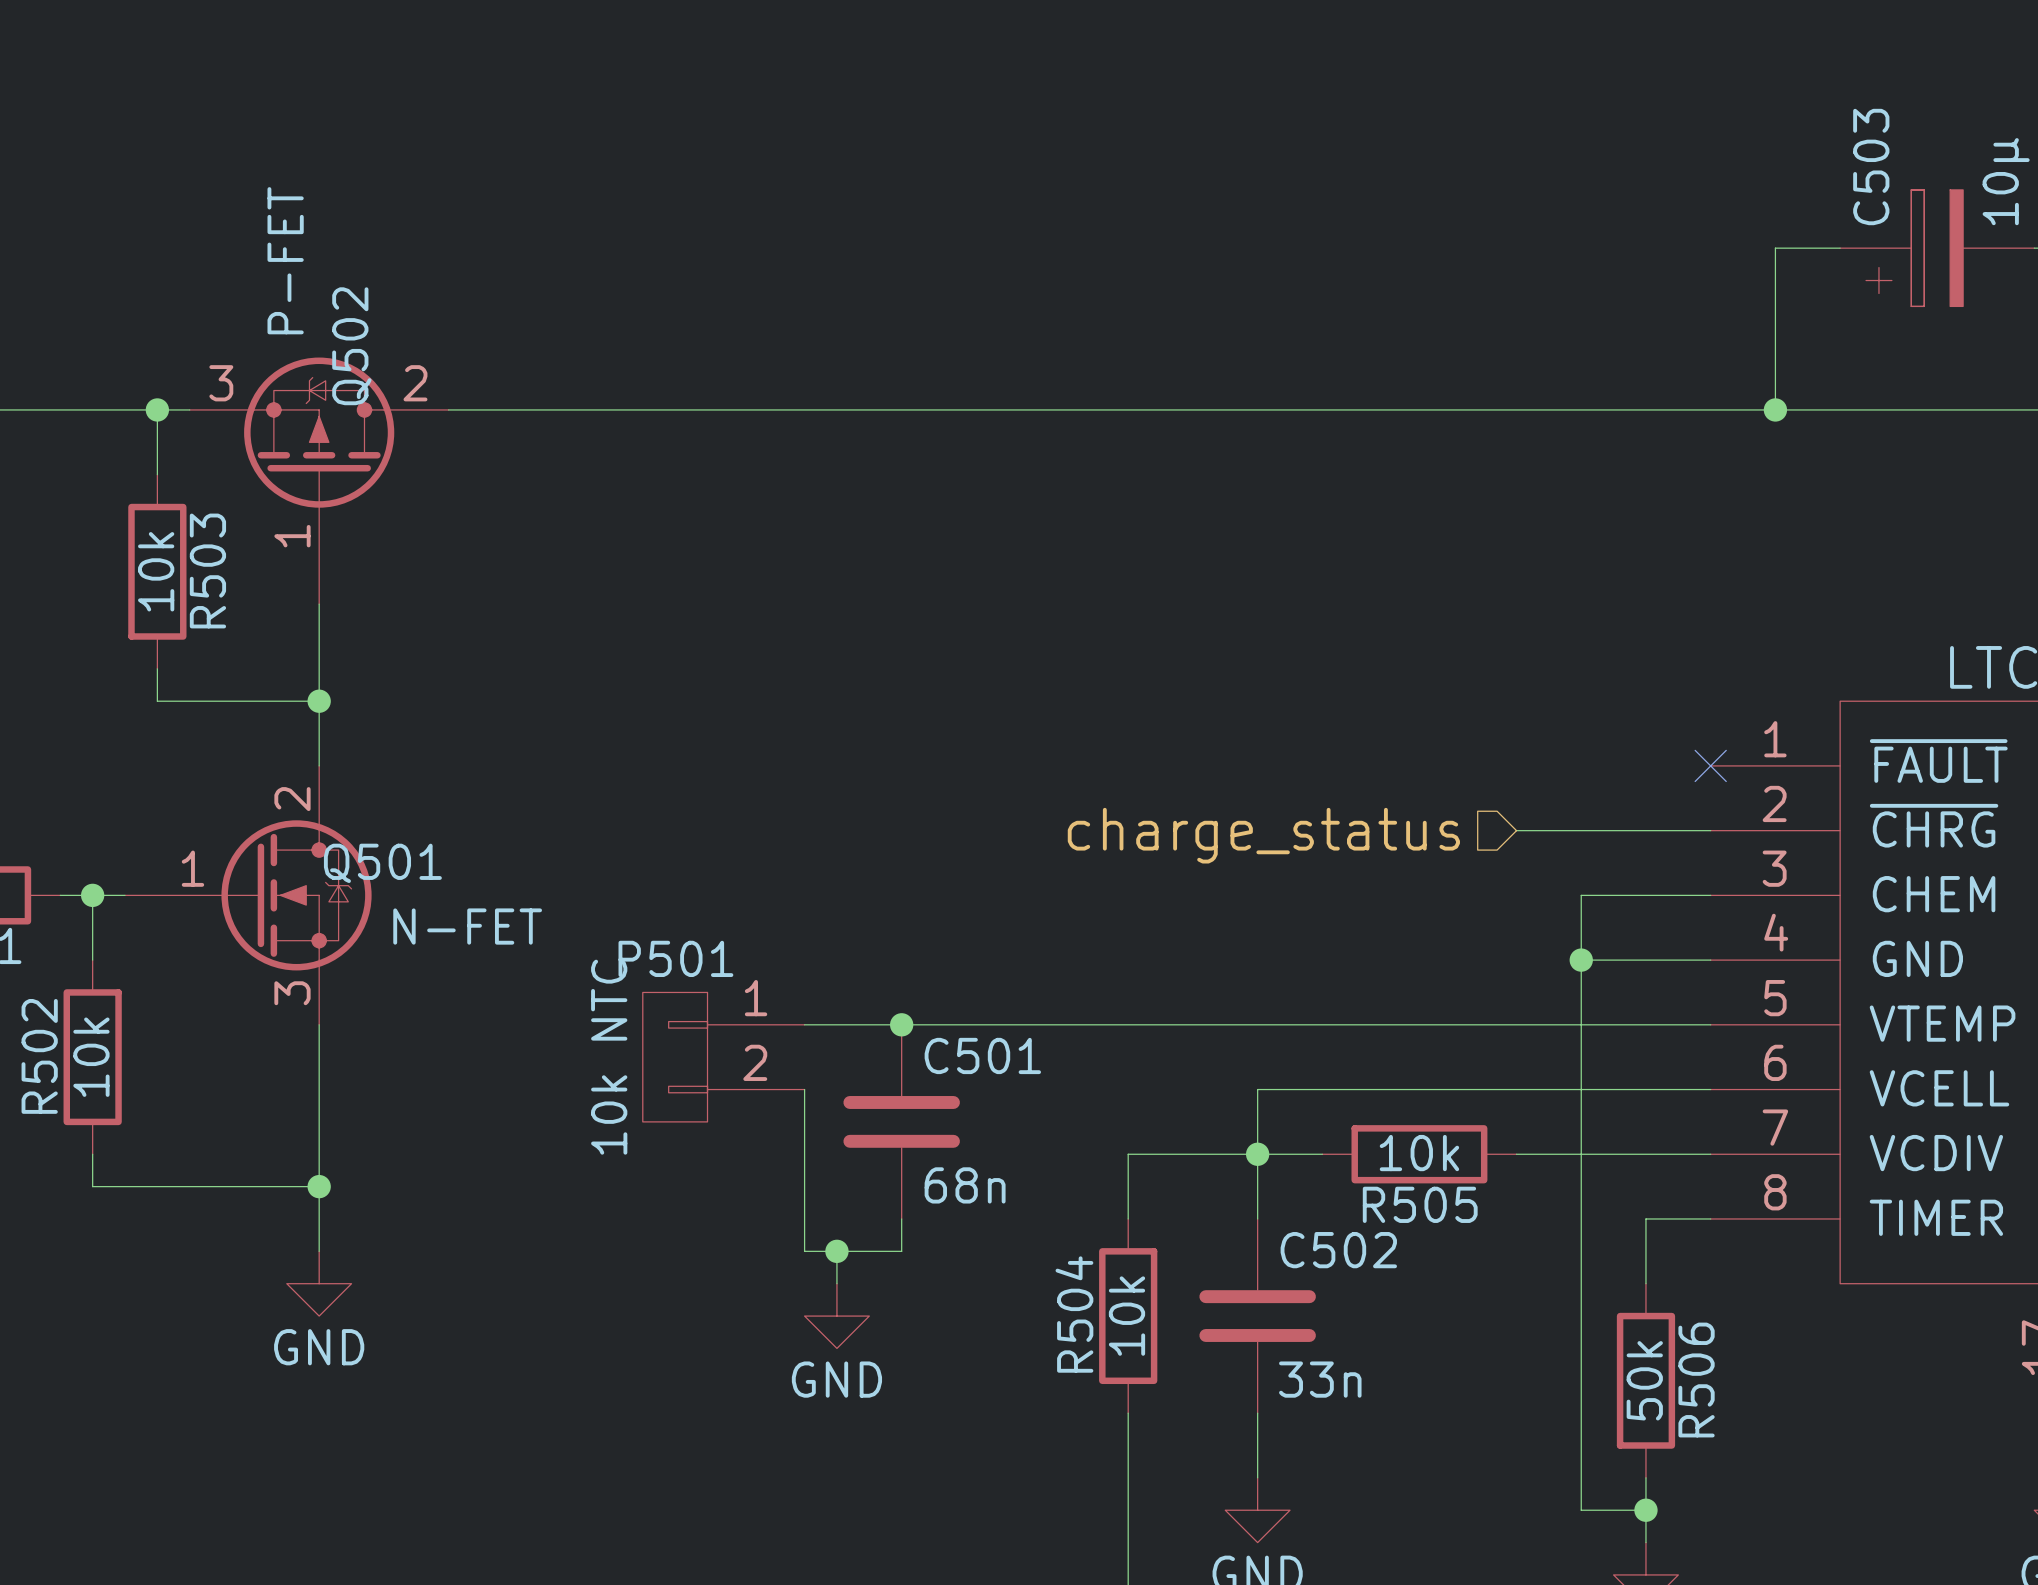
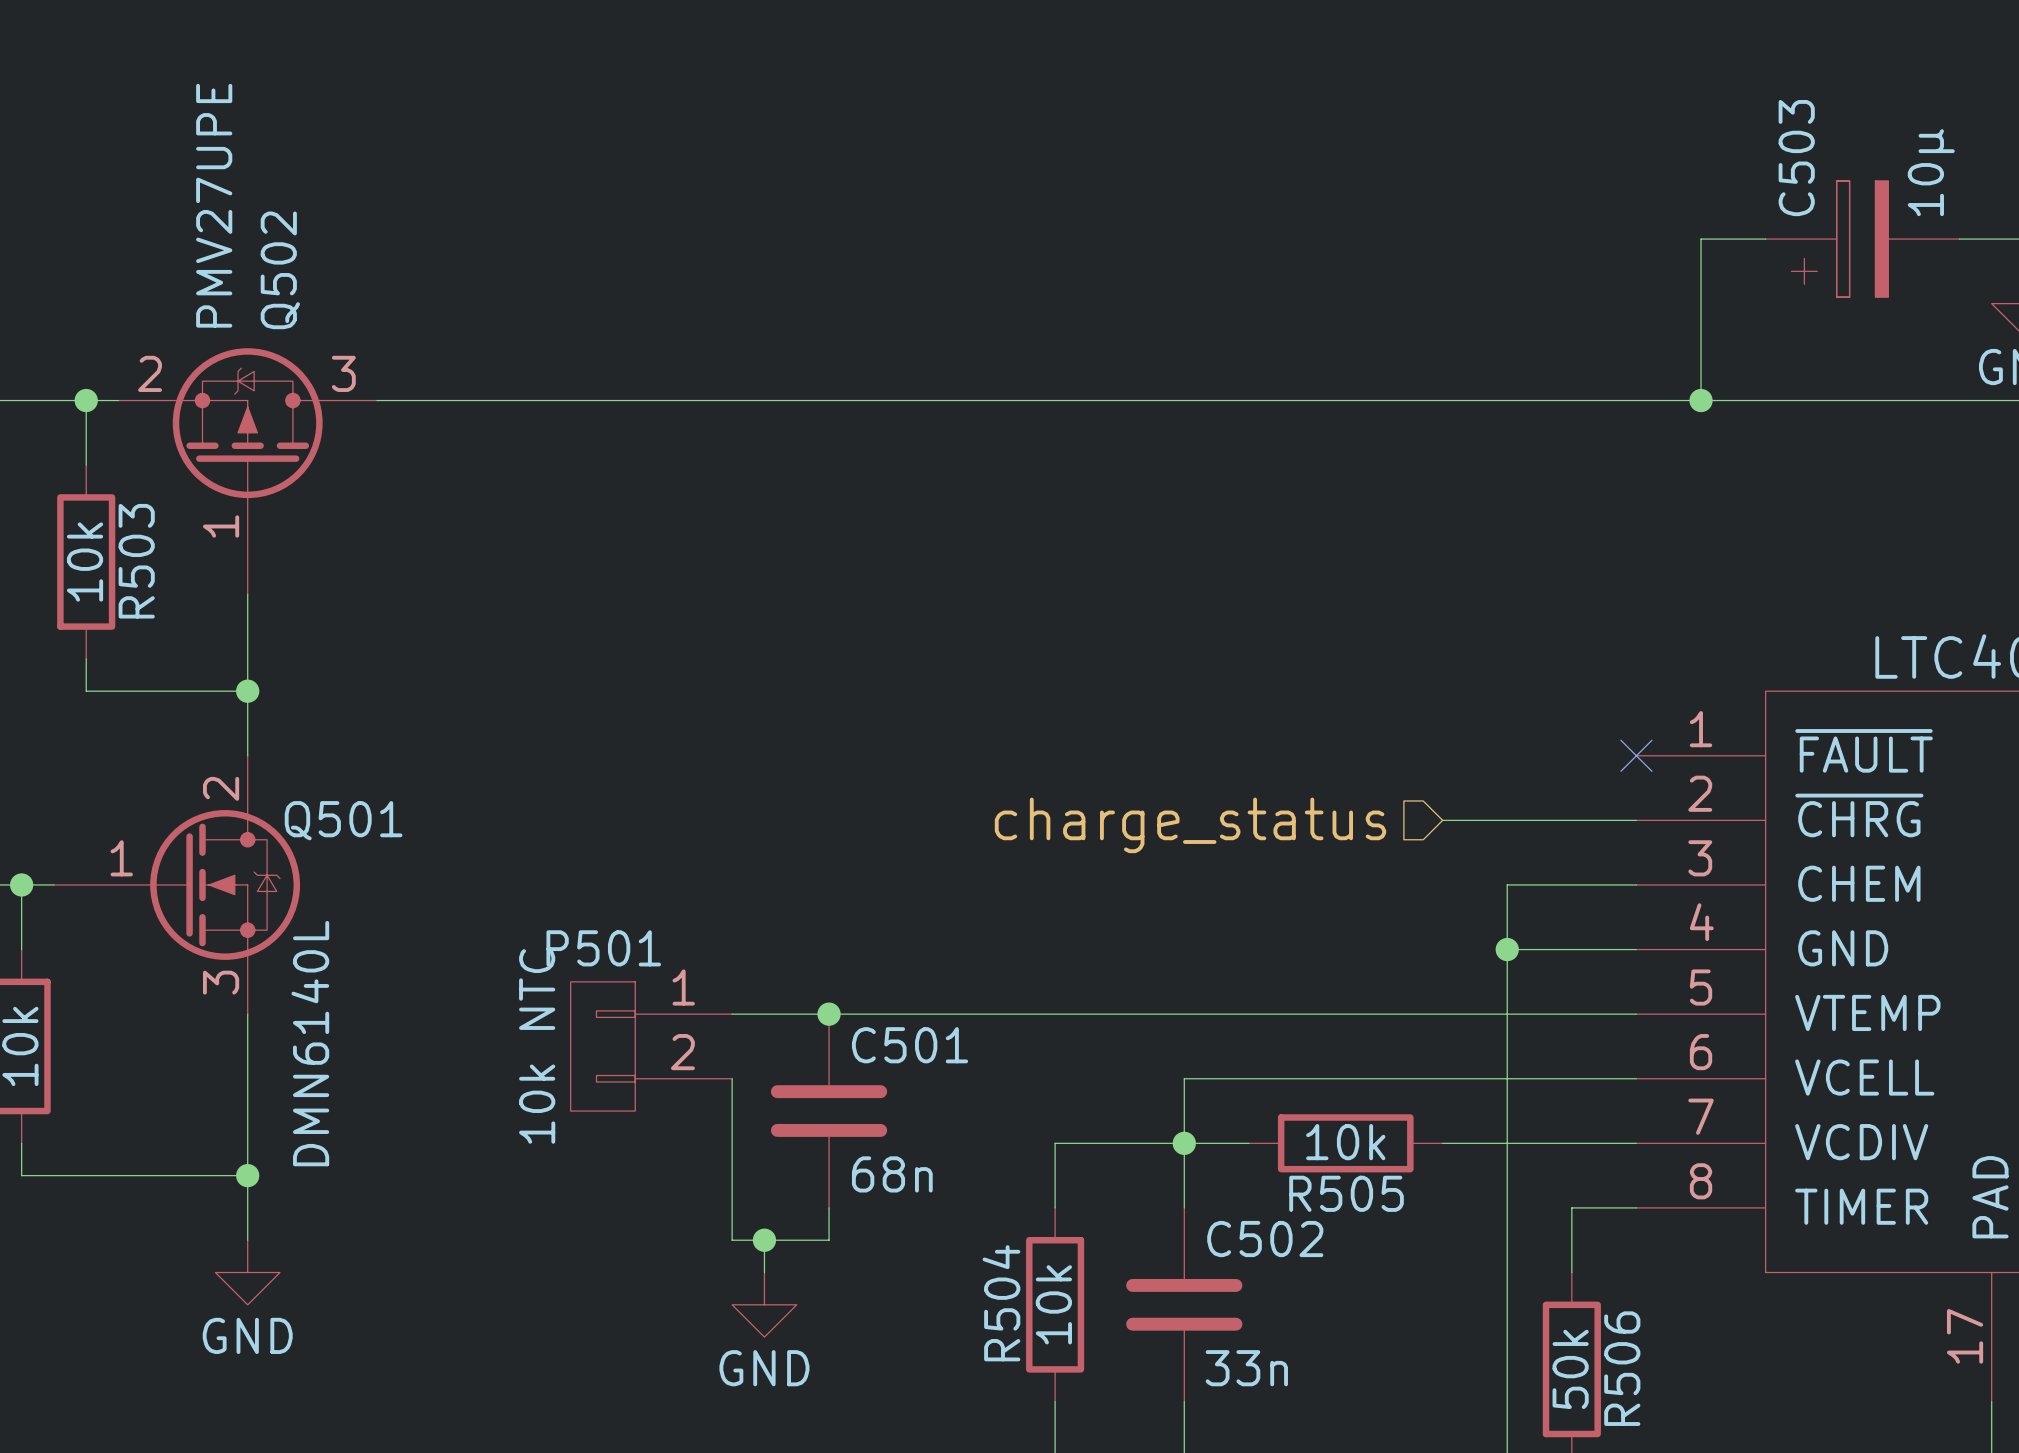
Q502 value: P-FET (285, 260) -> PMV27UPE (214, 205)
Q502 name position: Q502 (351, 346) -> Q502 (280, 270)
Q502 pin number: 3 (221, 383) -> 2 (150, 373)
Q502 pin number: 2 (415, 383) -> 3 (343, 373)
Q501 name position: Q501 (382, 863) -> Q501 (343, 820)
Q501 value: N-FET (467, 926) -> DMN6140L (310, 1043)

